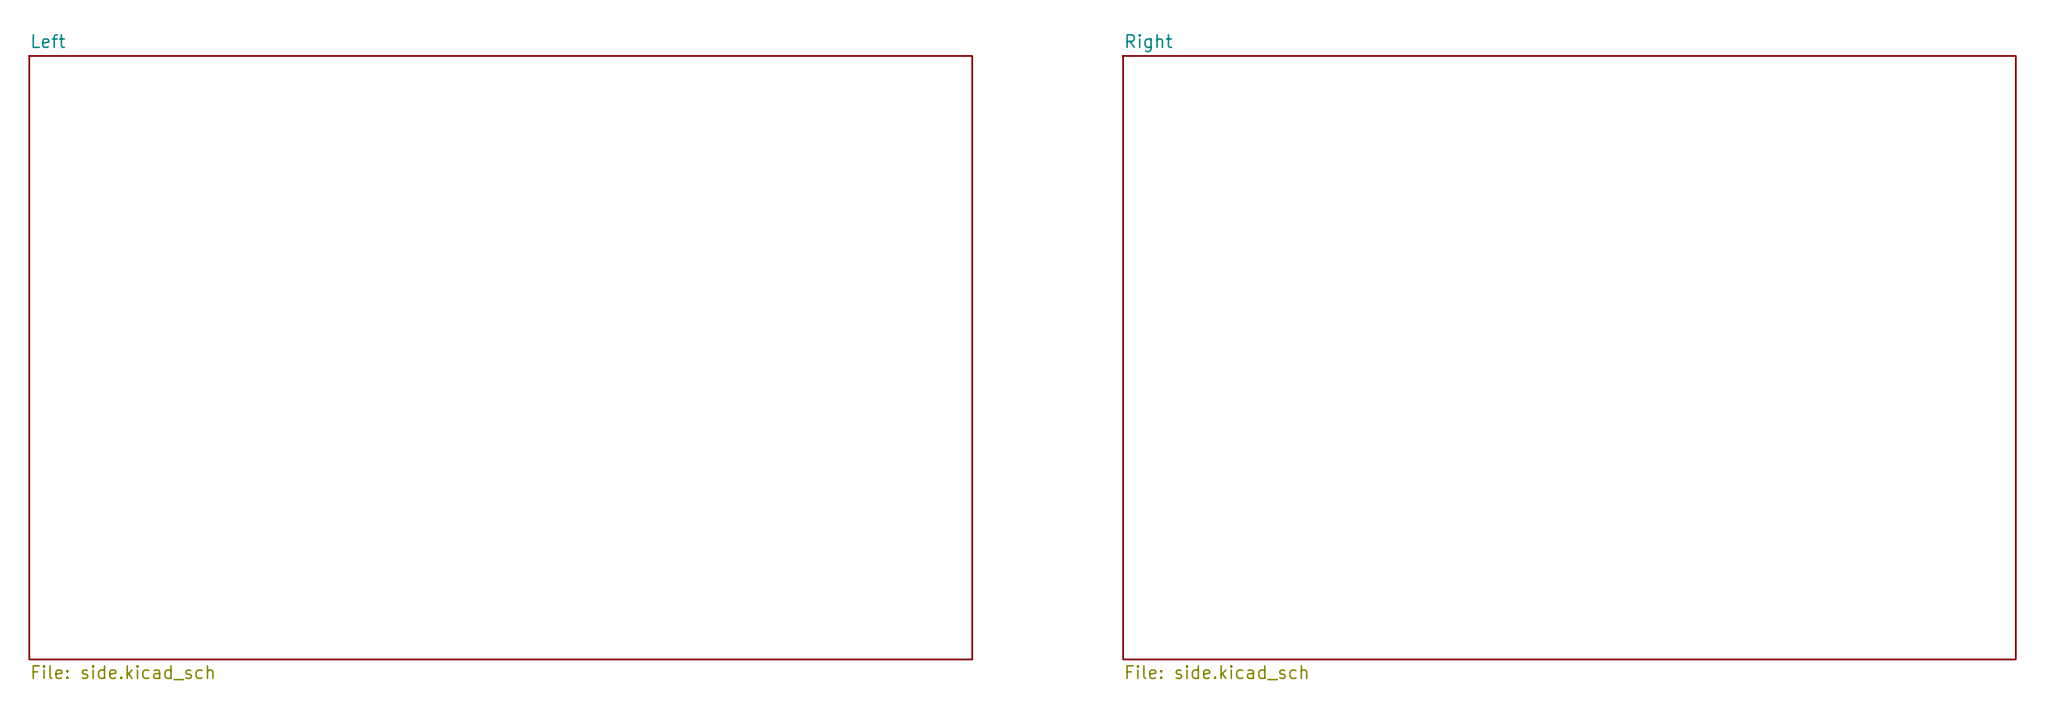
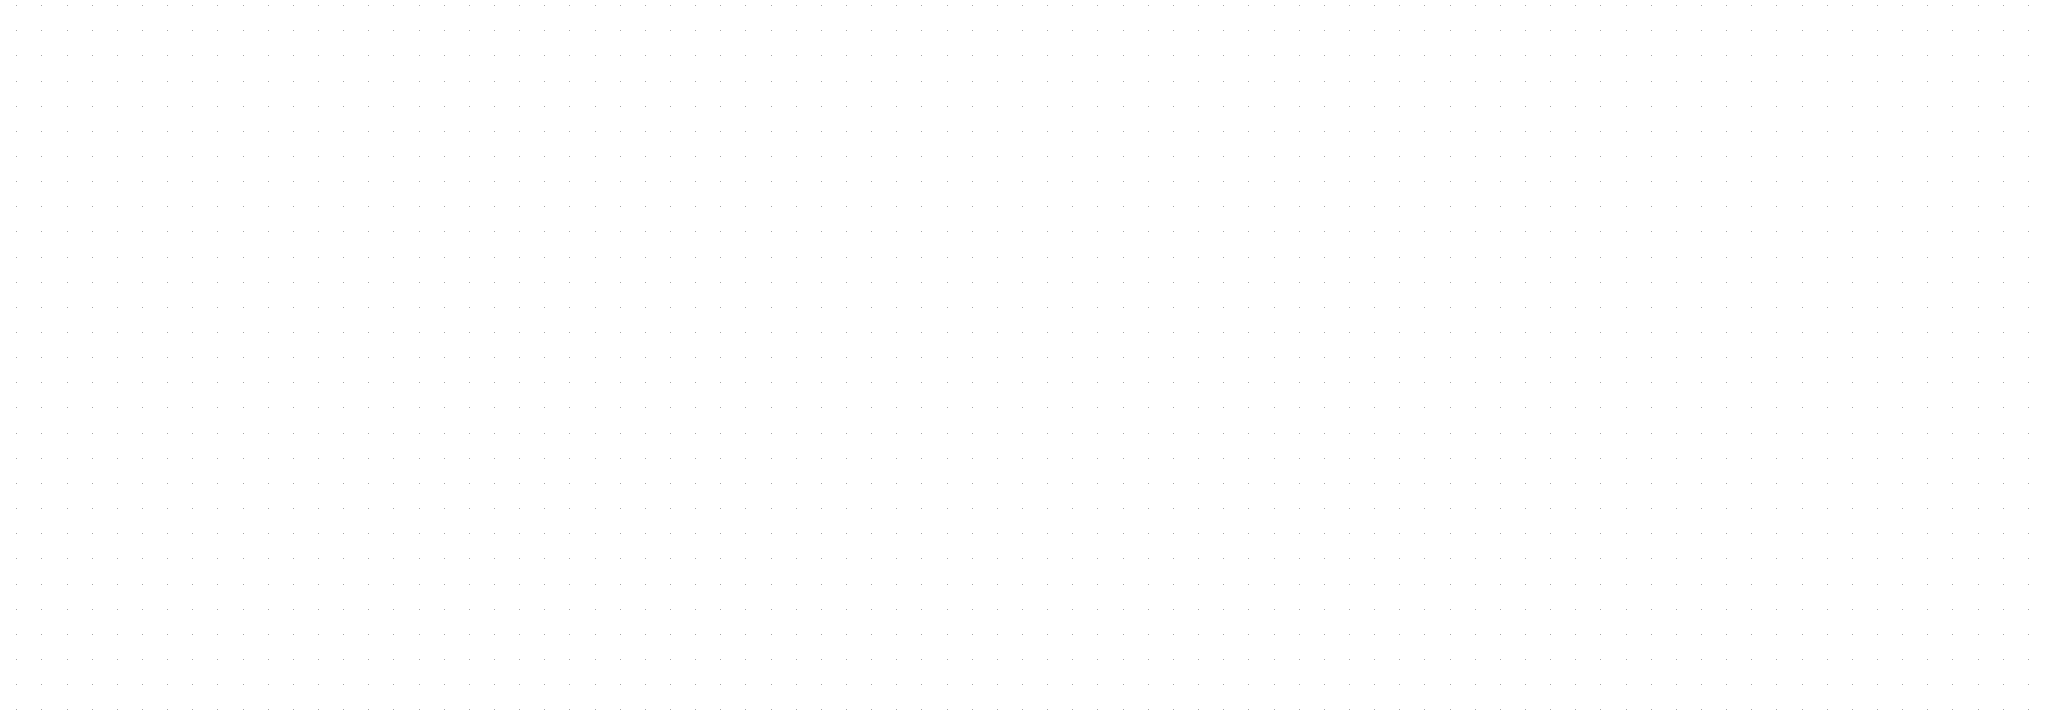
sheet Left: File: side.kicad_sch (500, 357) -> none
sheet Right: File: side.kicad_sch (1569, 357) -> none

